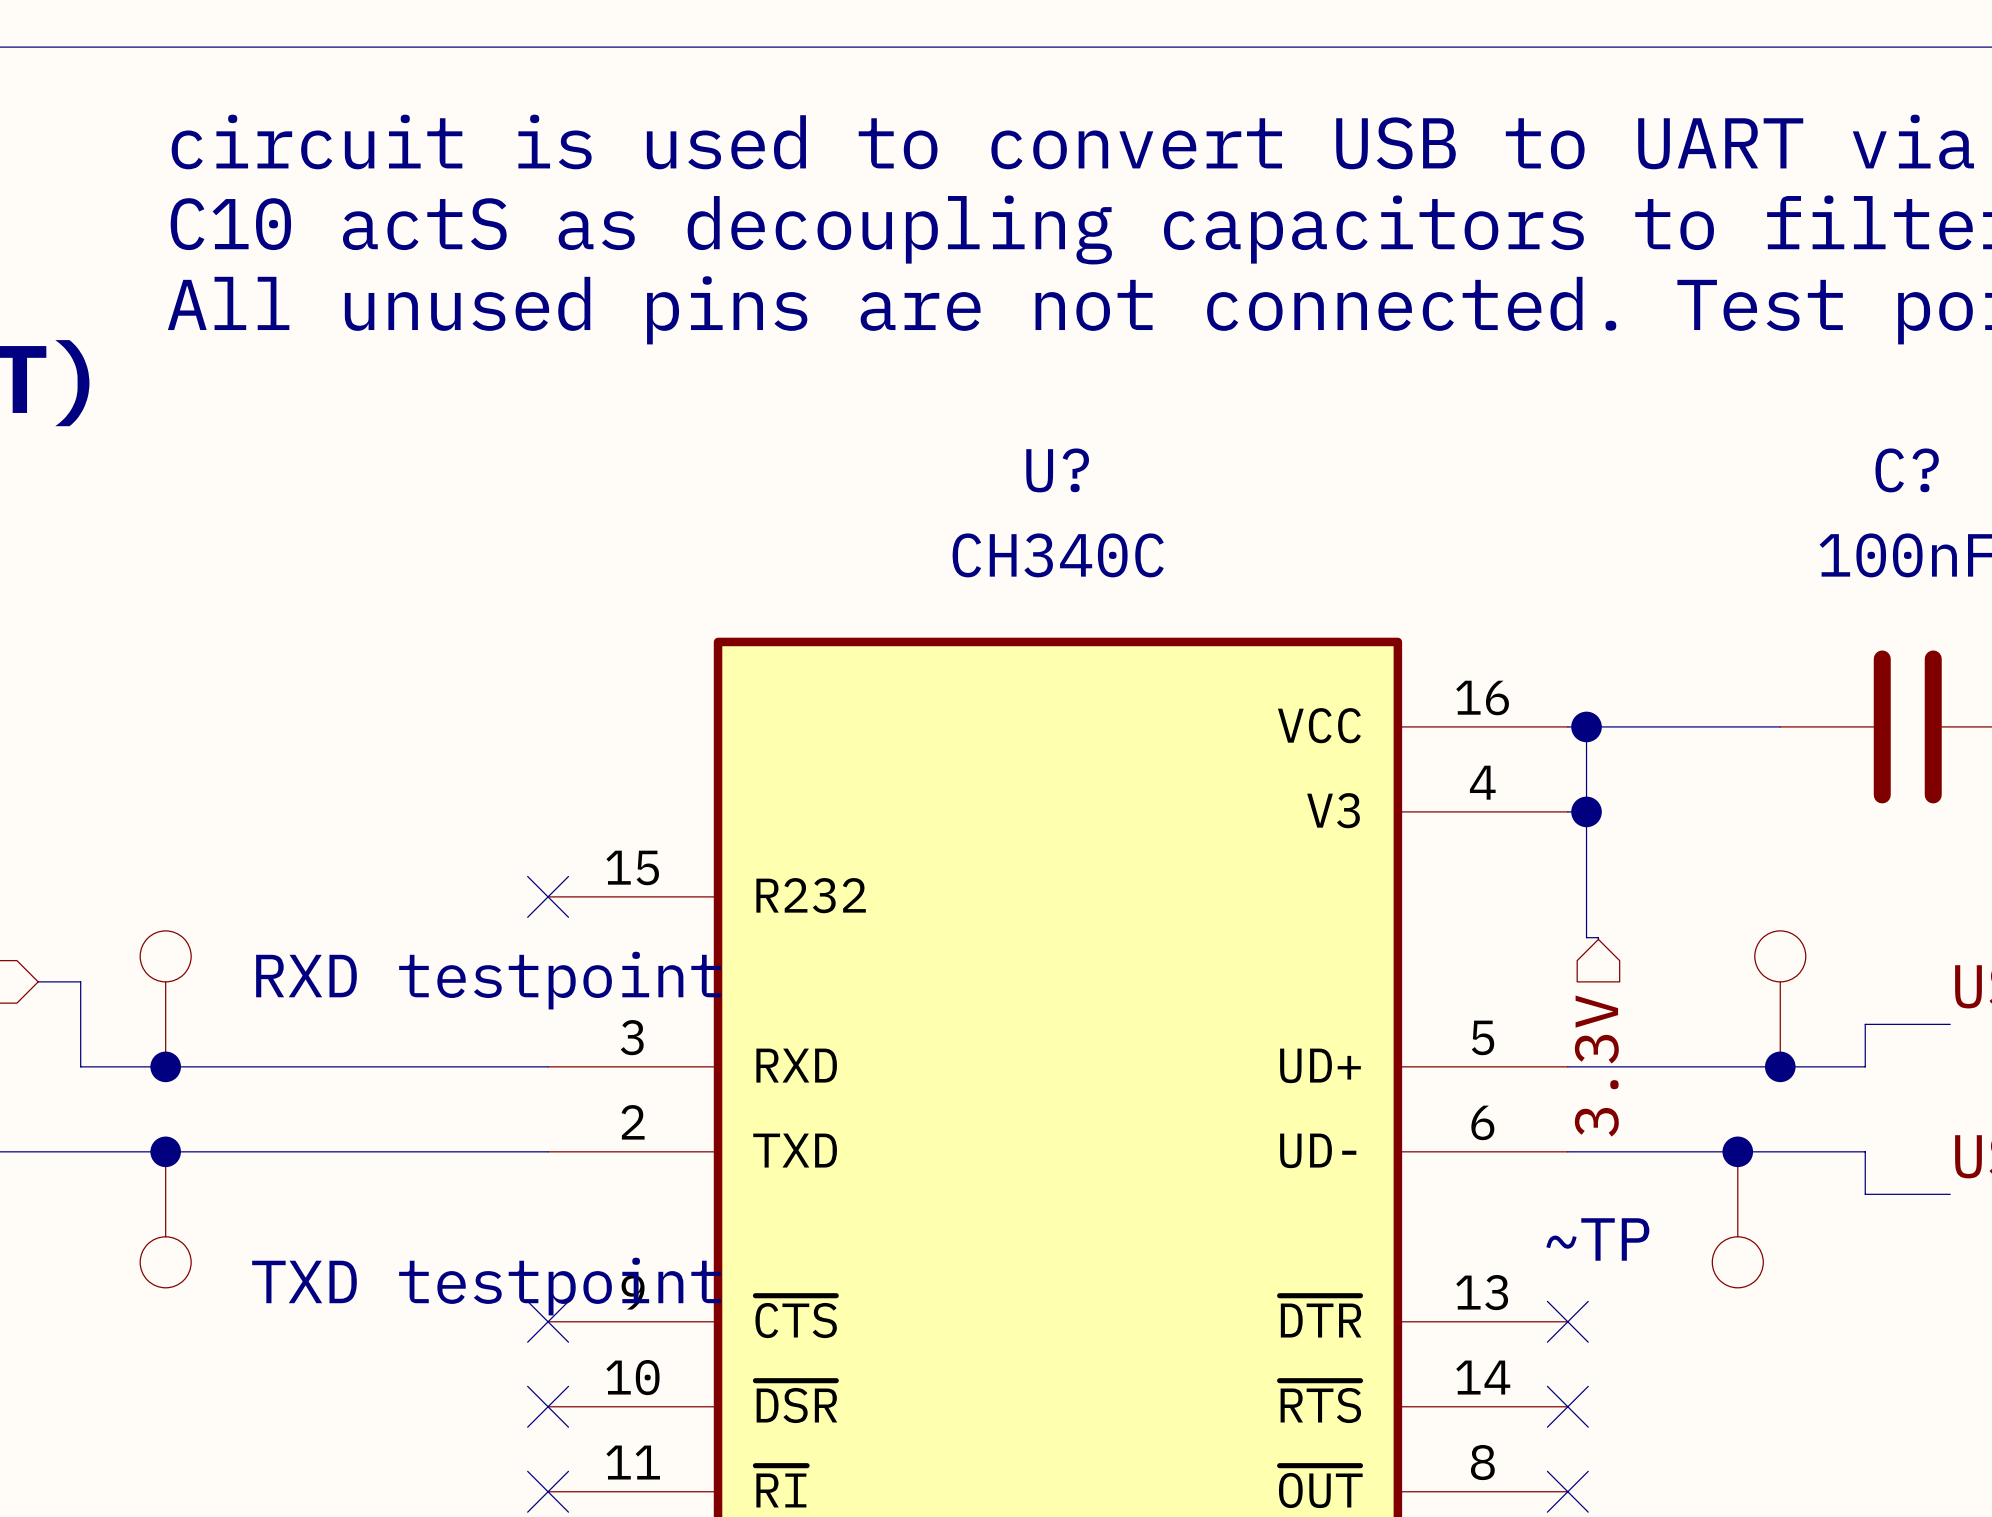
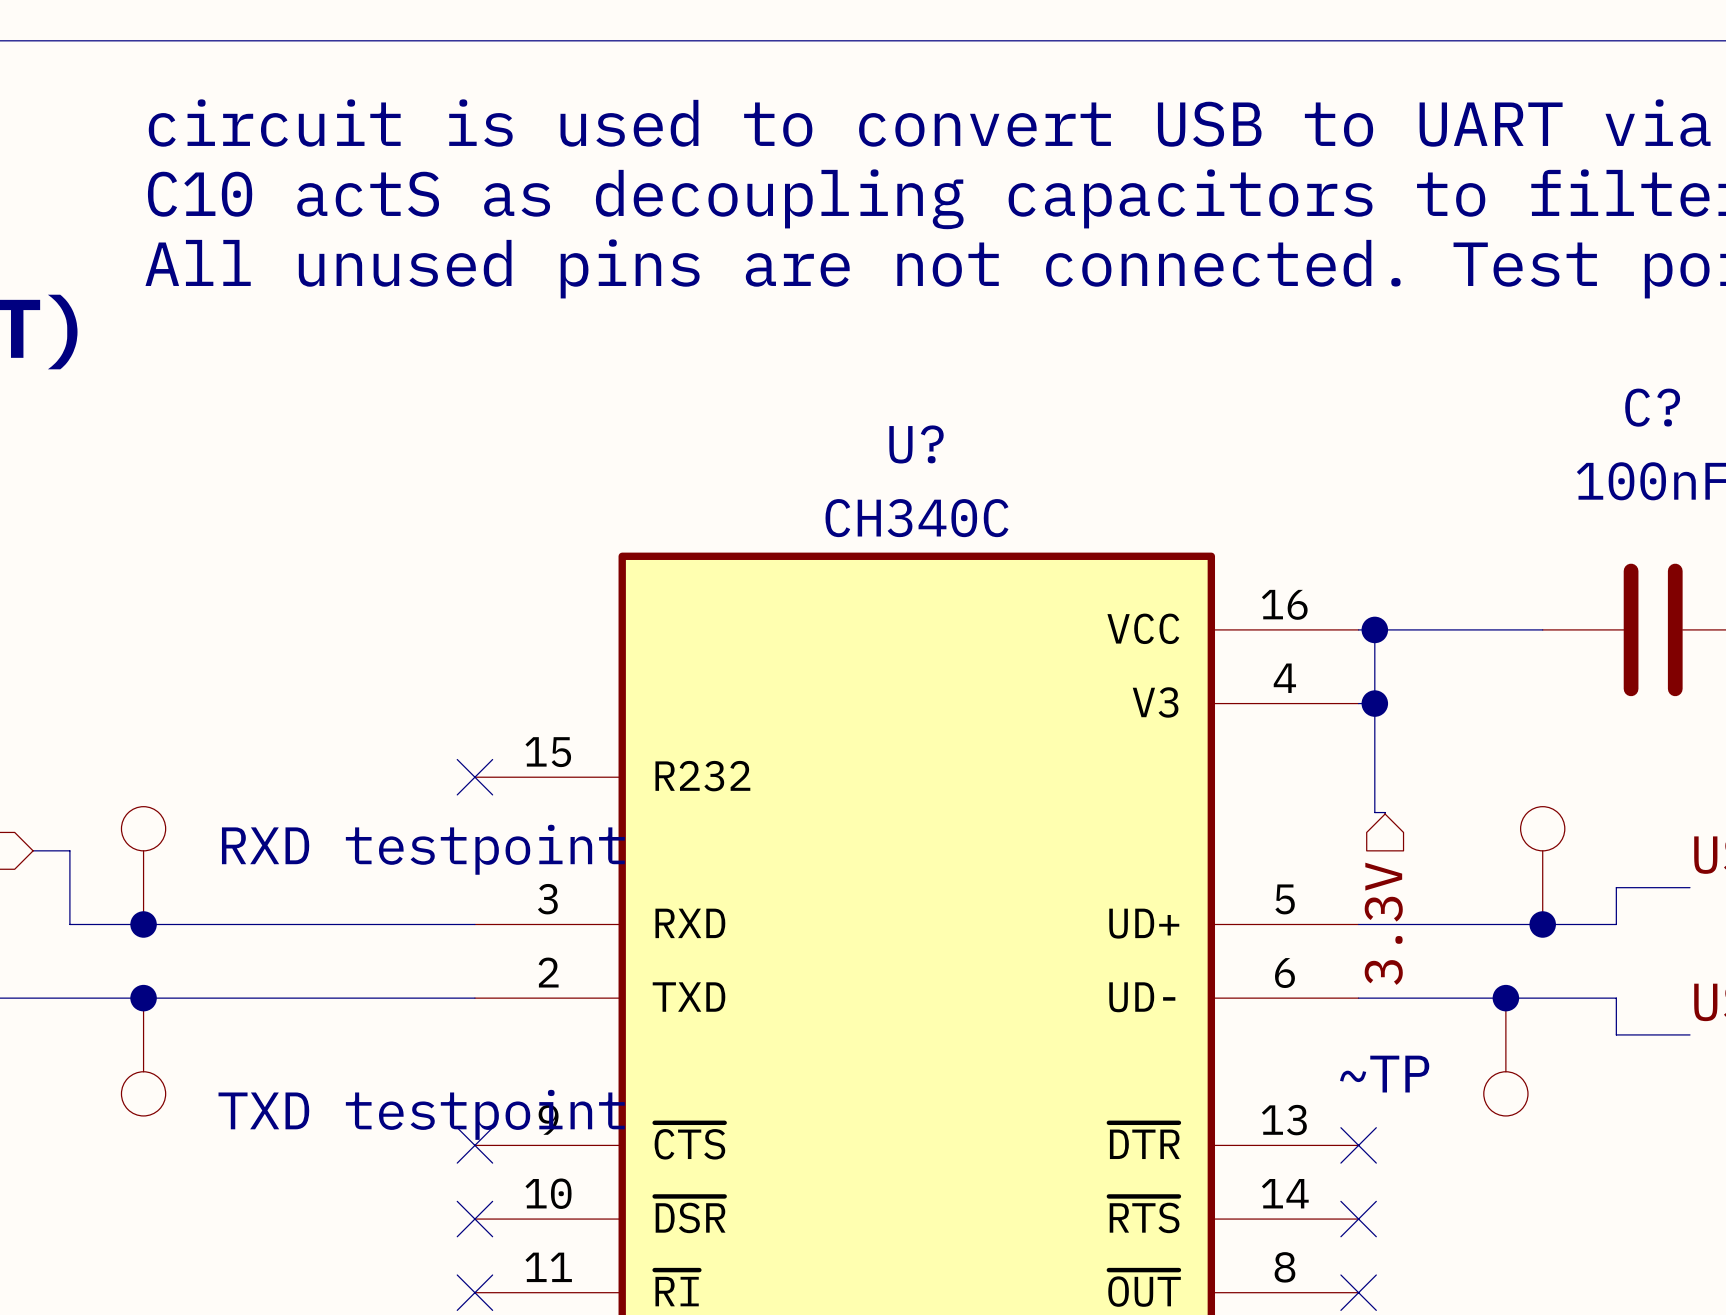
U? name position: U? (1057, 470) -> U? (916, 444)
U? value position: CH340C (1058, 555) -> CH340C (916, 518)

